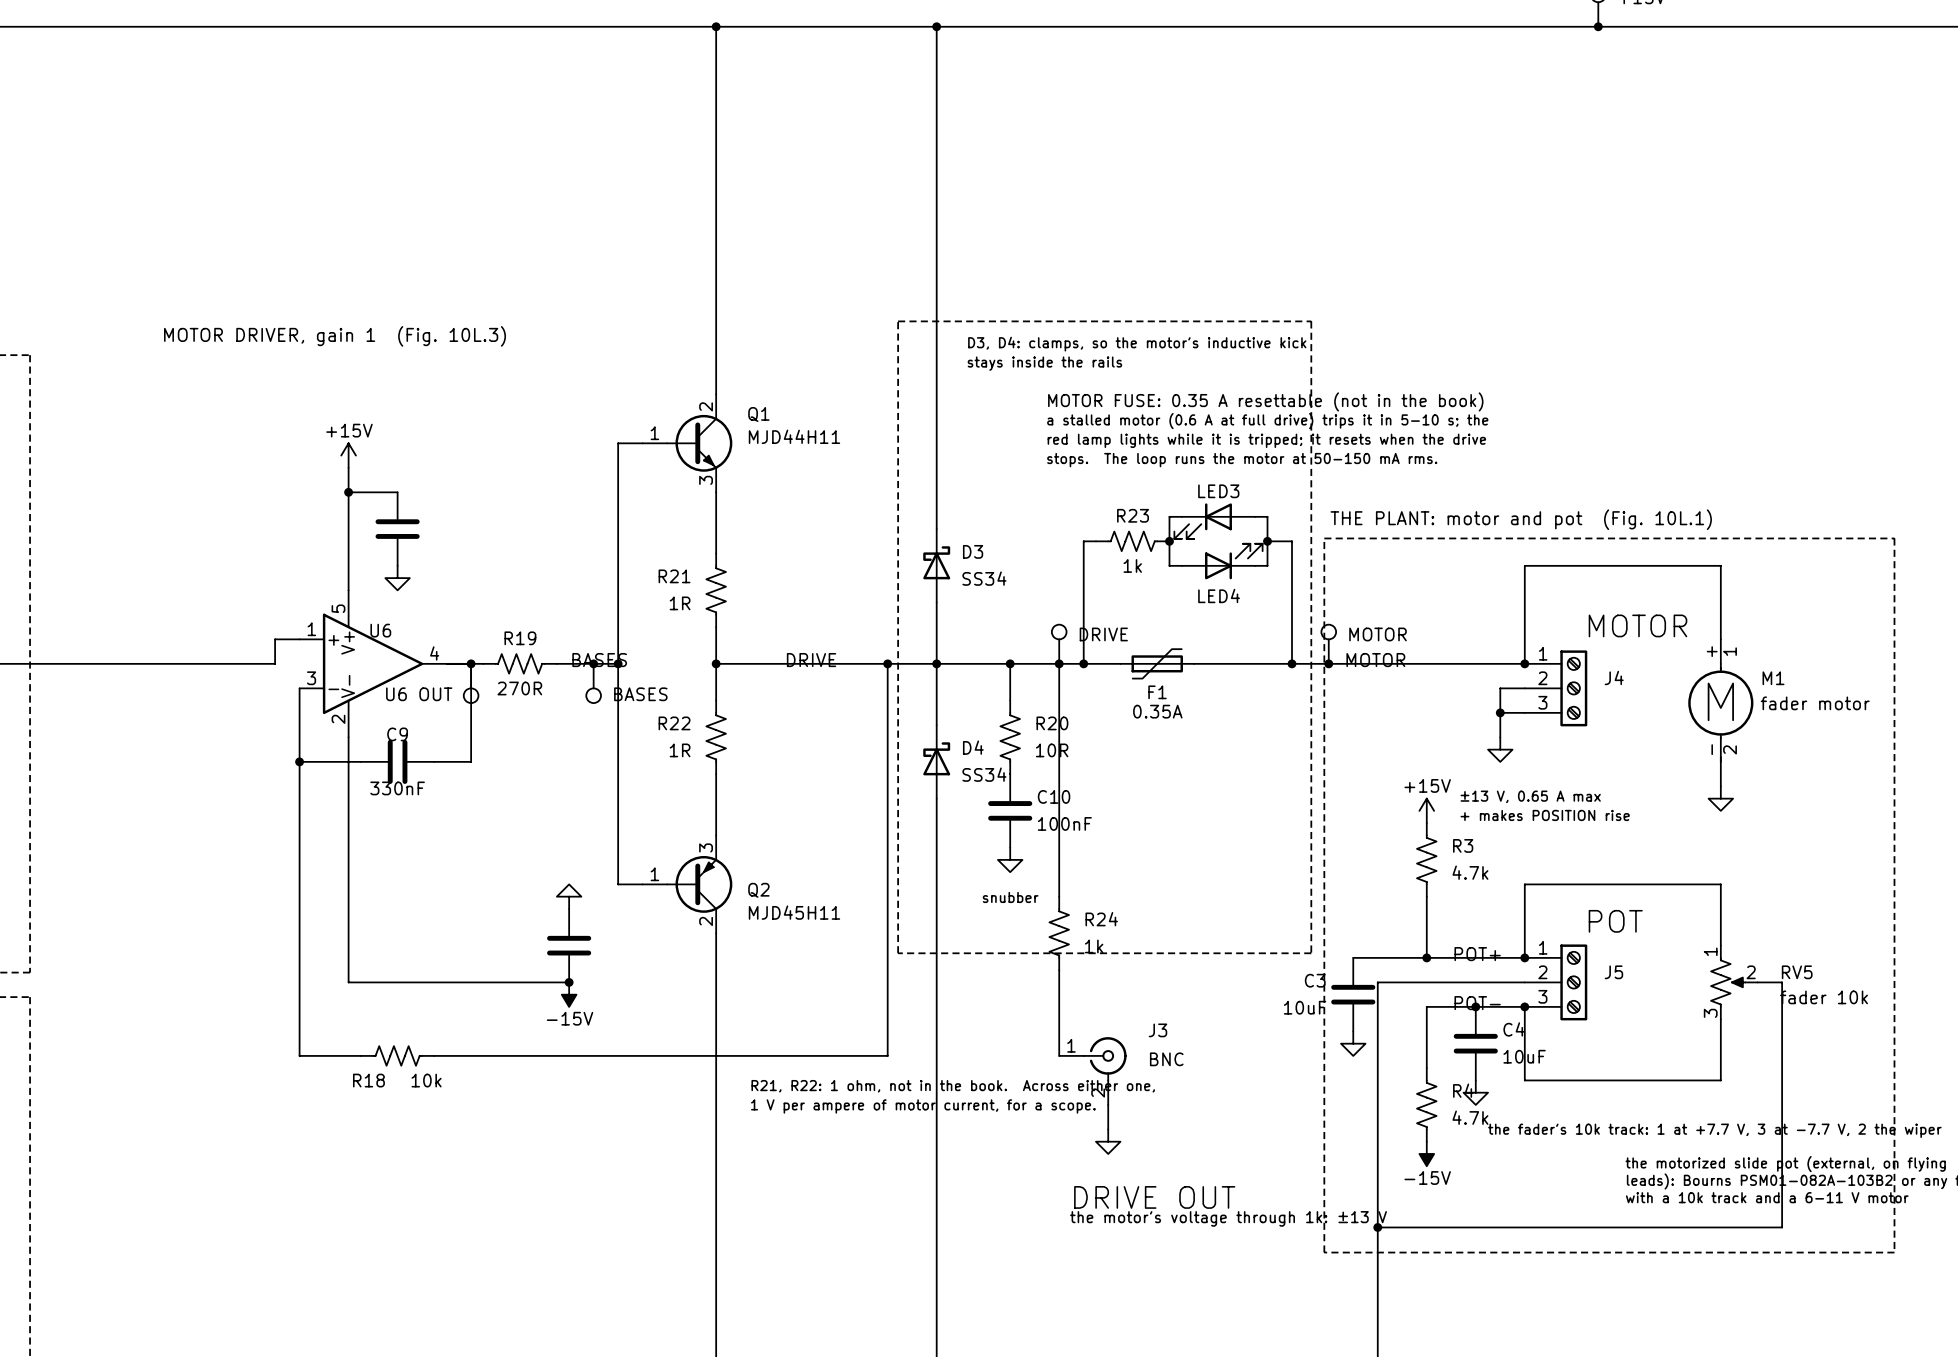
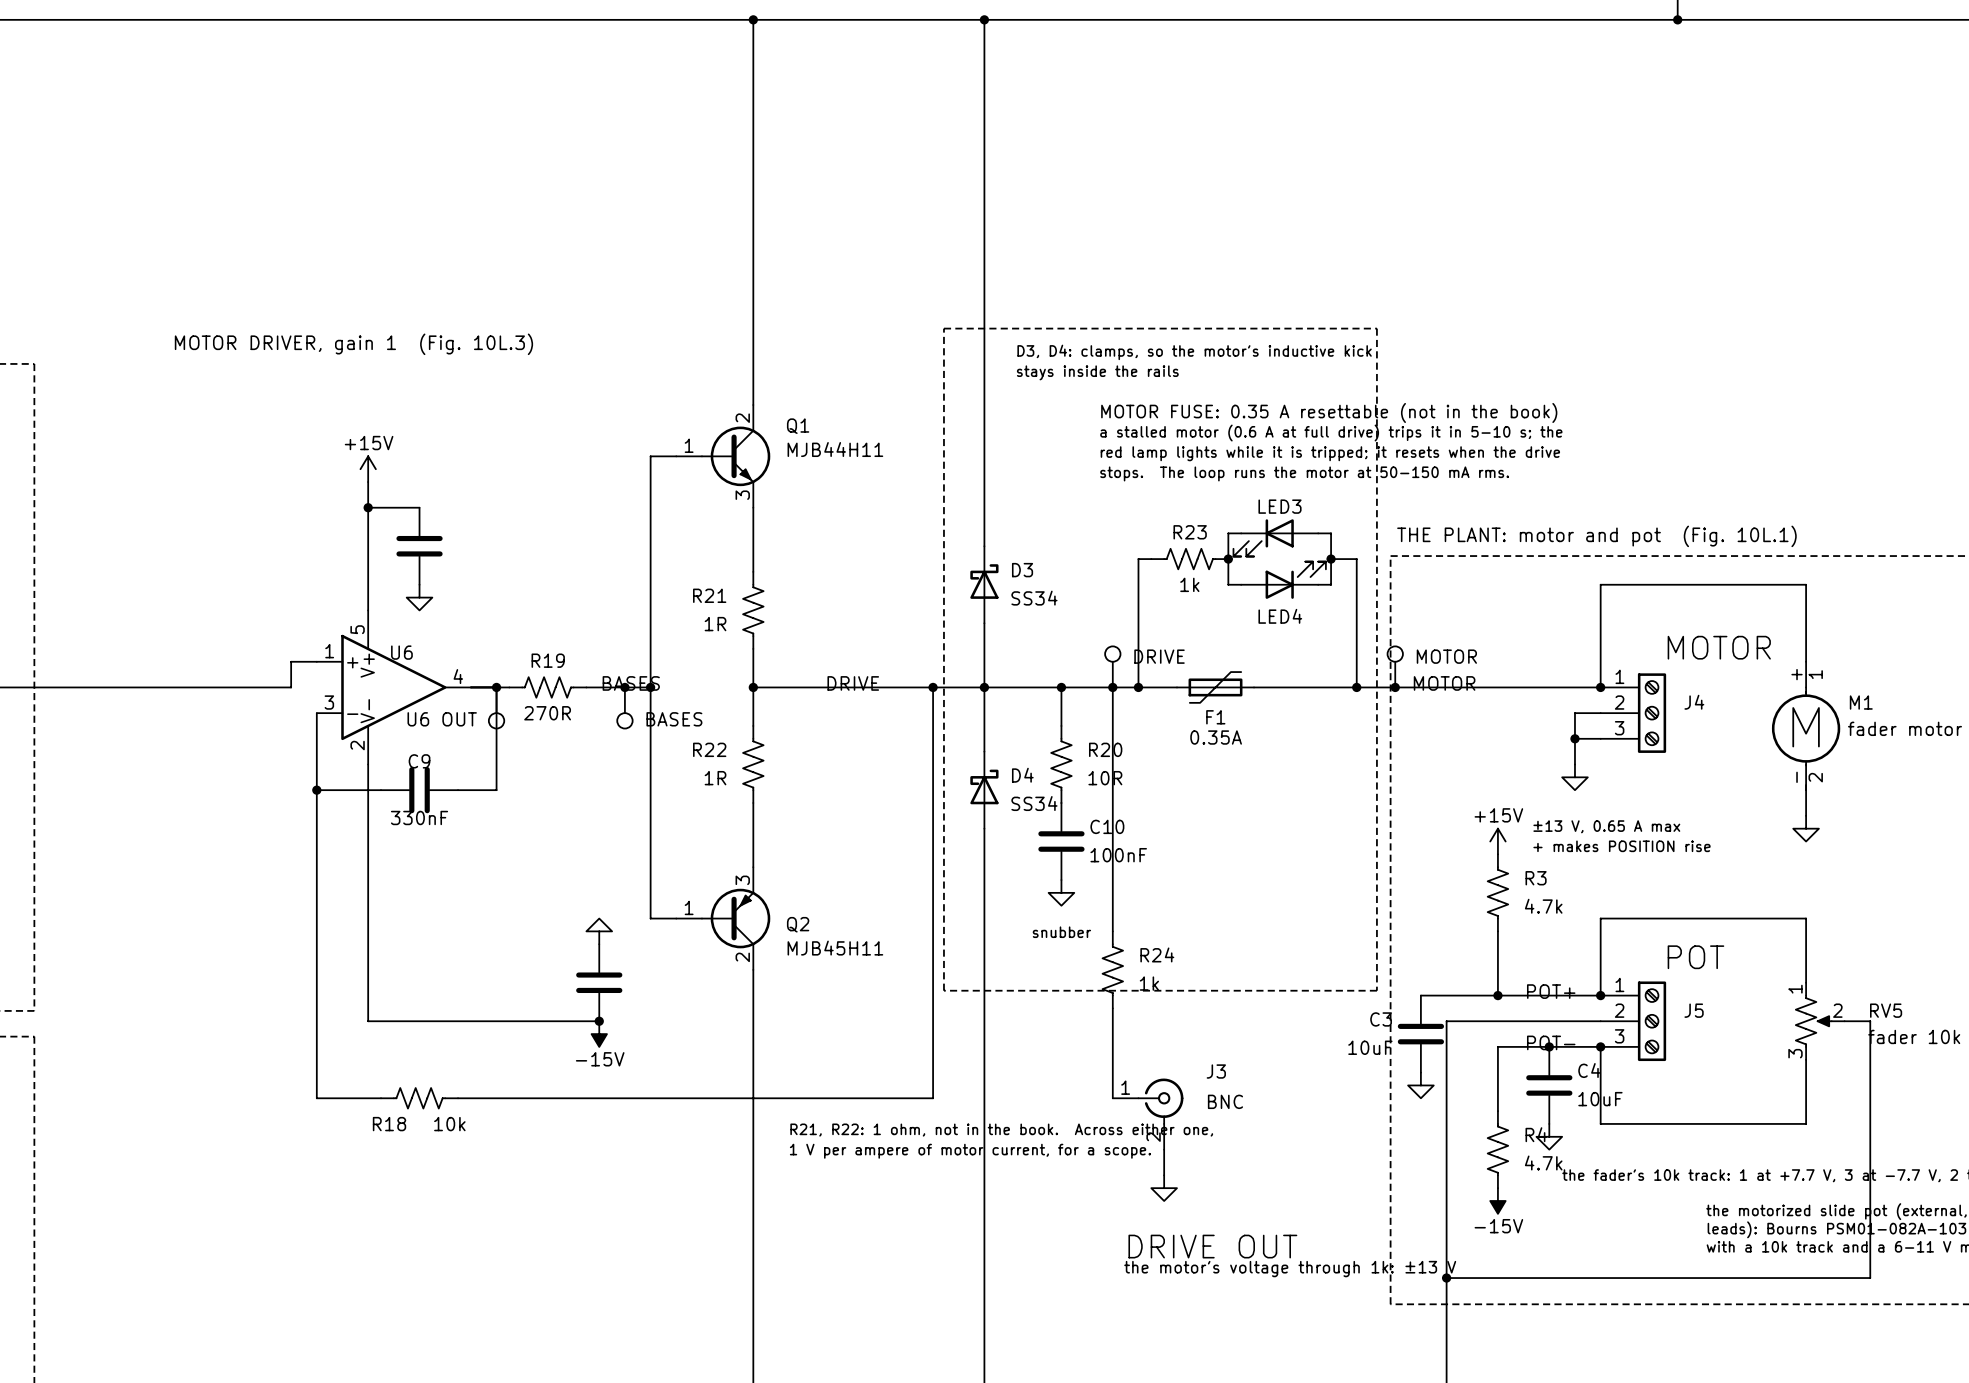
Q1 value: MJD44H11 (794, 436) -> MJB44H11 (835, 449)
Q2 value: MJD45H11 (794, 912) -> MJB45H11 (835, 948)

